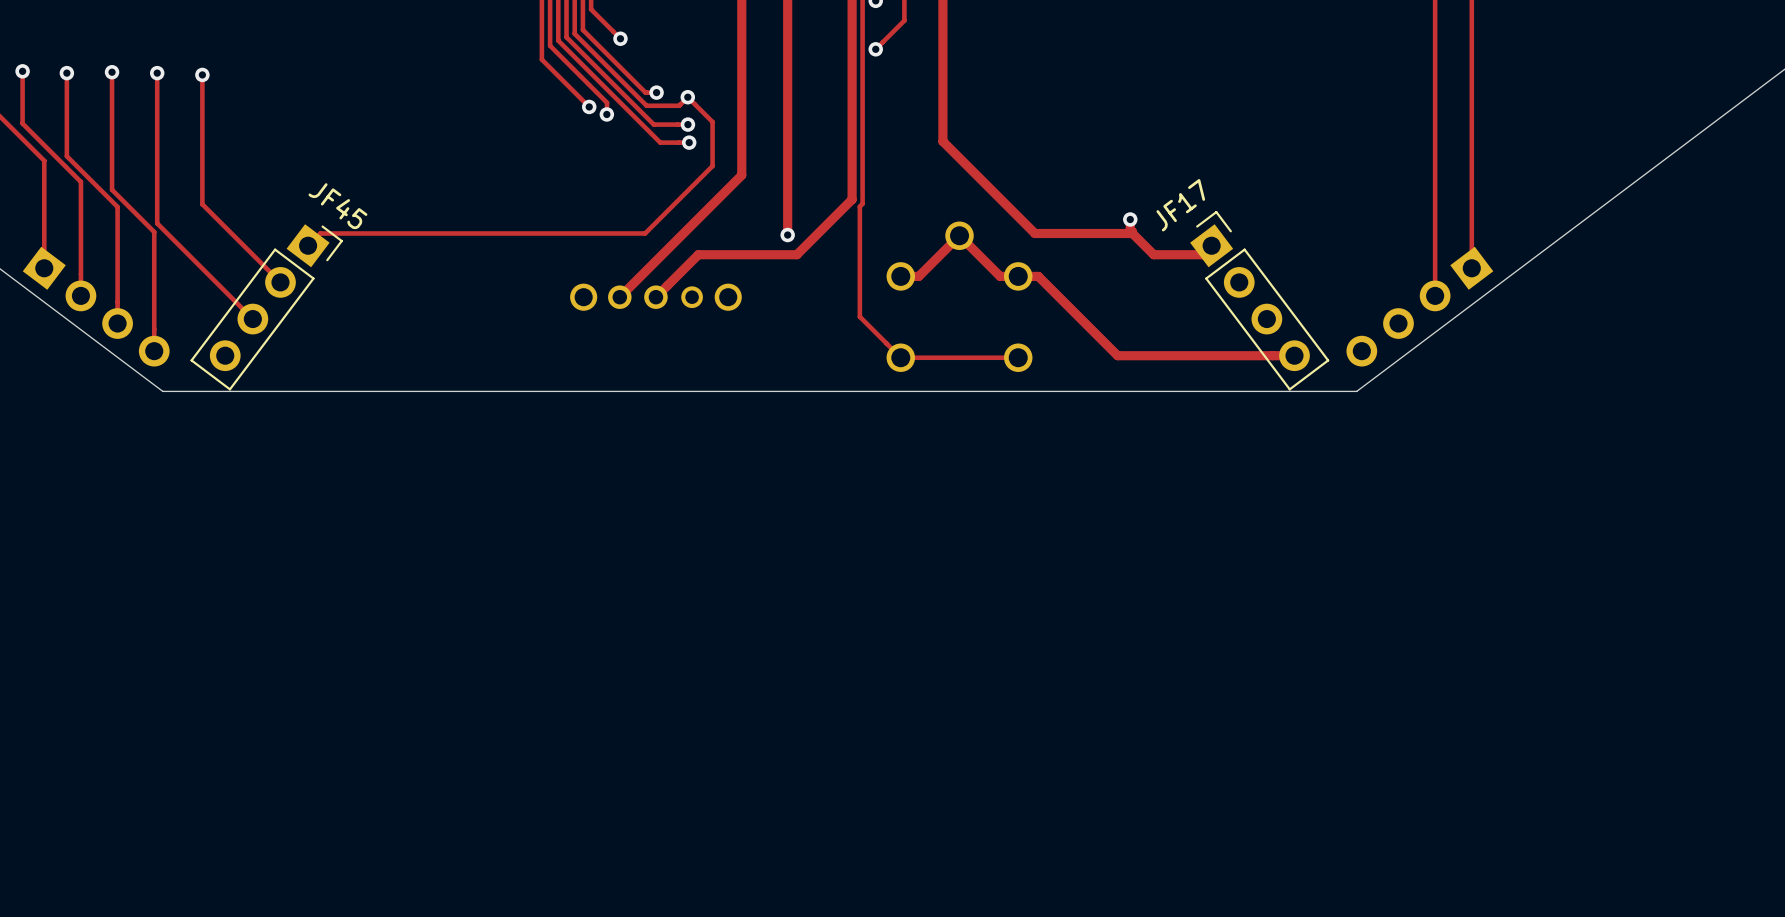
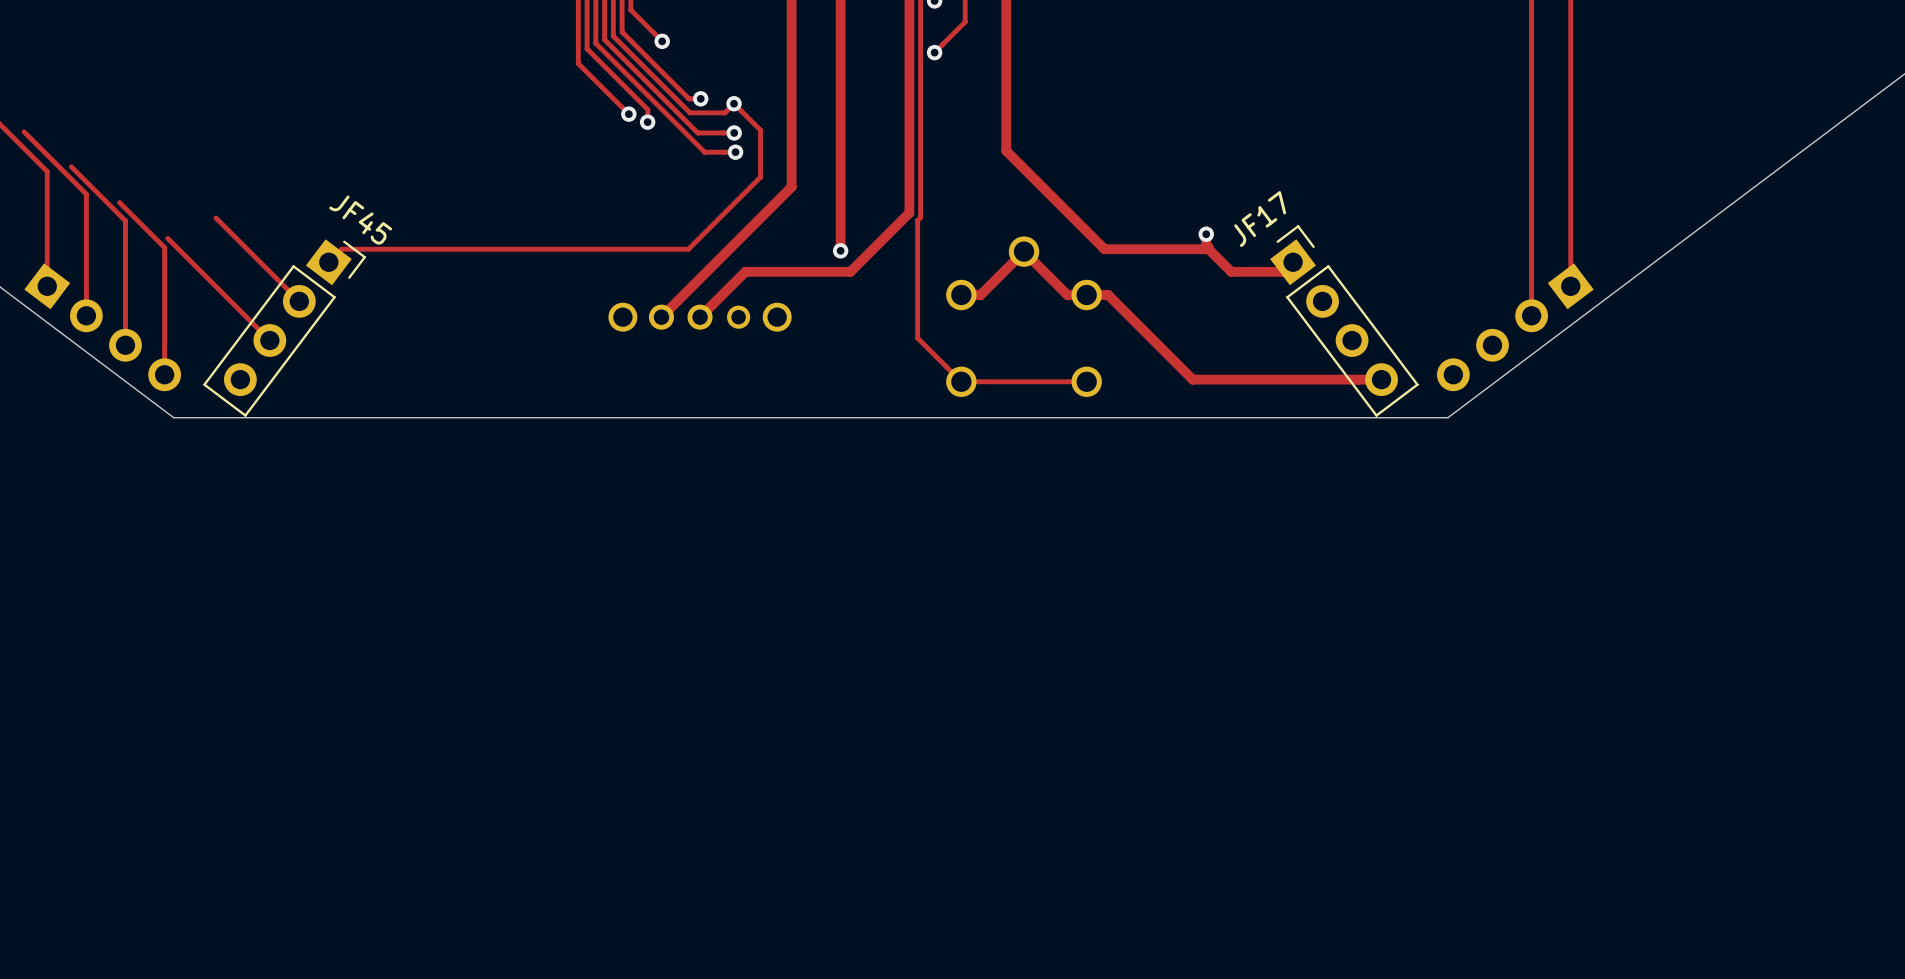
track: (22, 71) (22, 123) -> none
via: (22, 71) -> none
track: (112, 72) (112, 189) -> none
via: (112, 72) -> none
track: (66, 73) (66, 156) -> none
via: (66, 73) -> none
track: (157, 73) (157, 223) -> none
via: (157, 73) -> none
track: (202, 74) (202, 204) -> none
via: (202, 74) -> none

